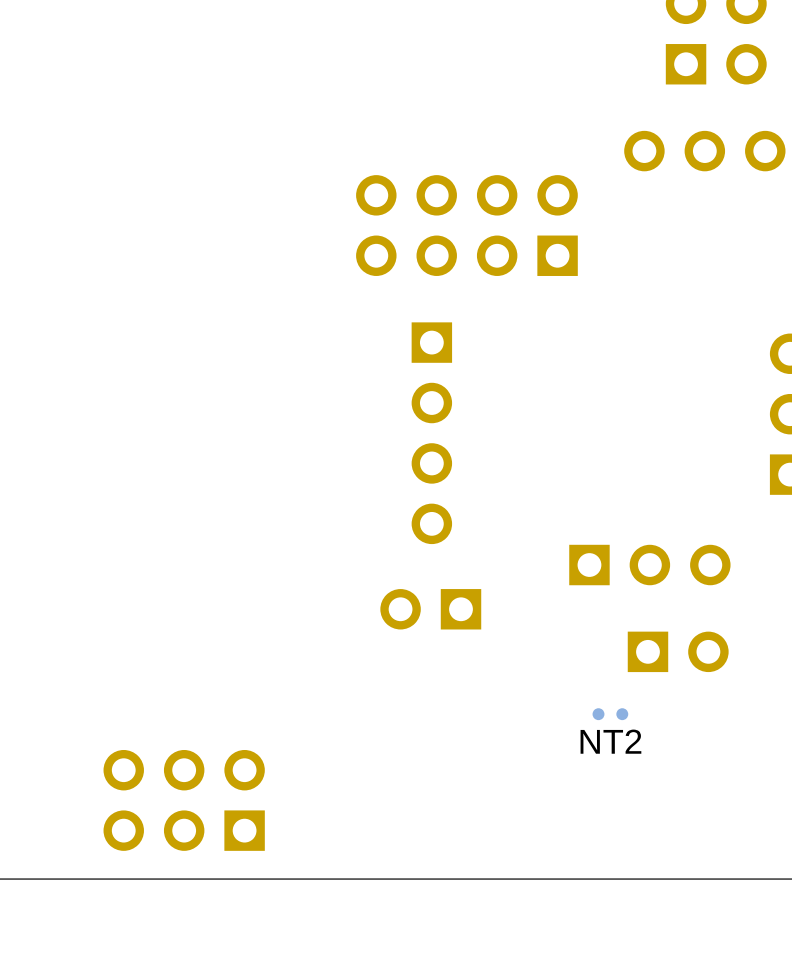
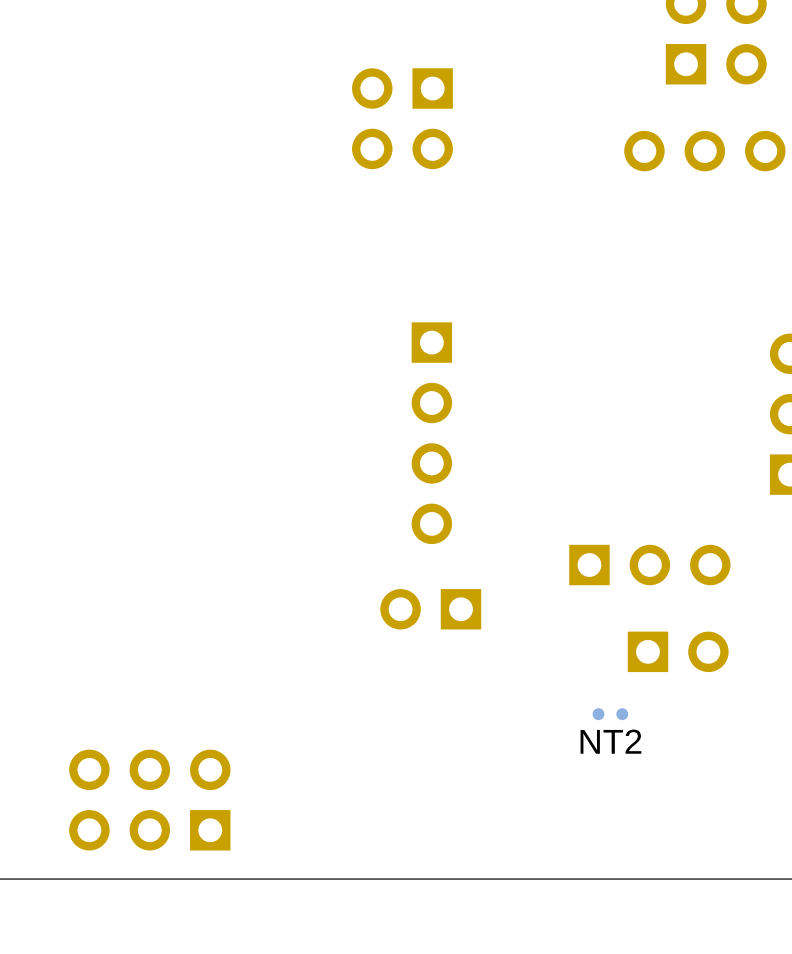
part: none -> (402, 118)
part: (466, 225) -> none
part position: (184, 800) -> (149, 800)

